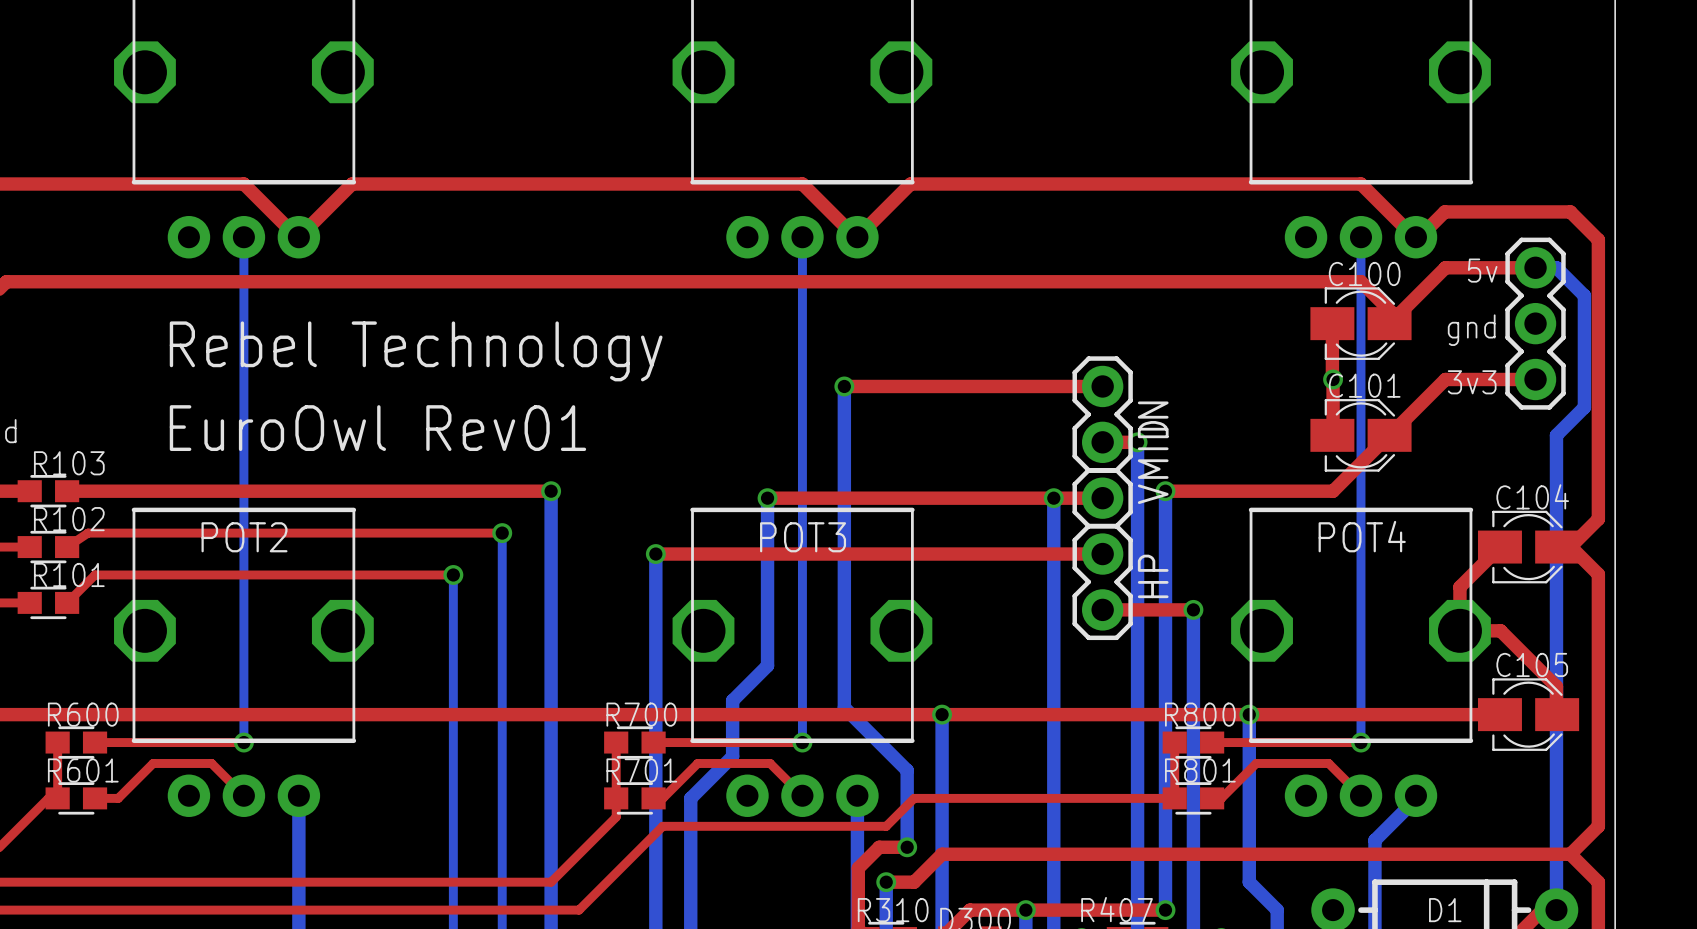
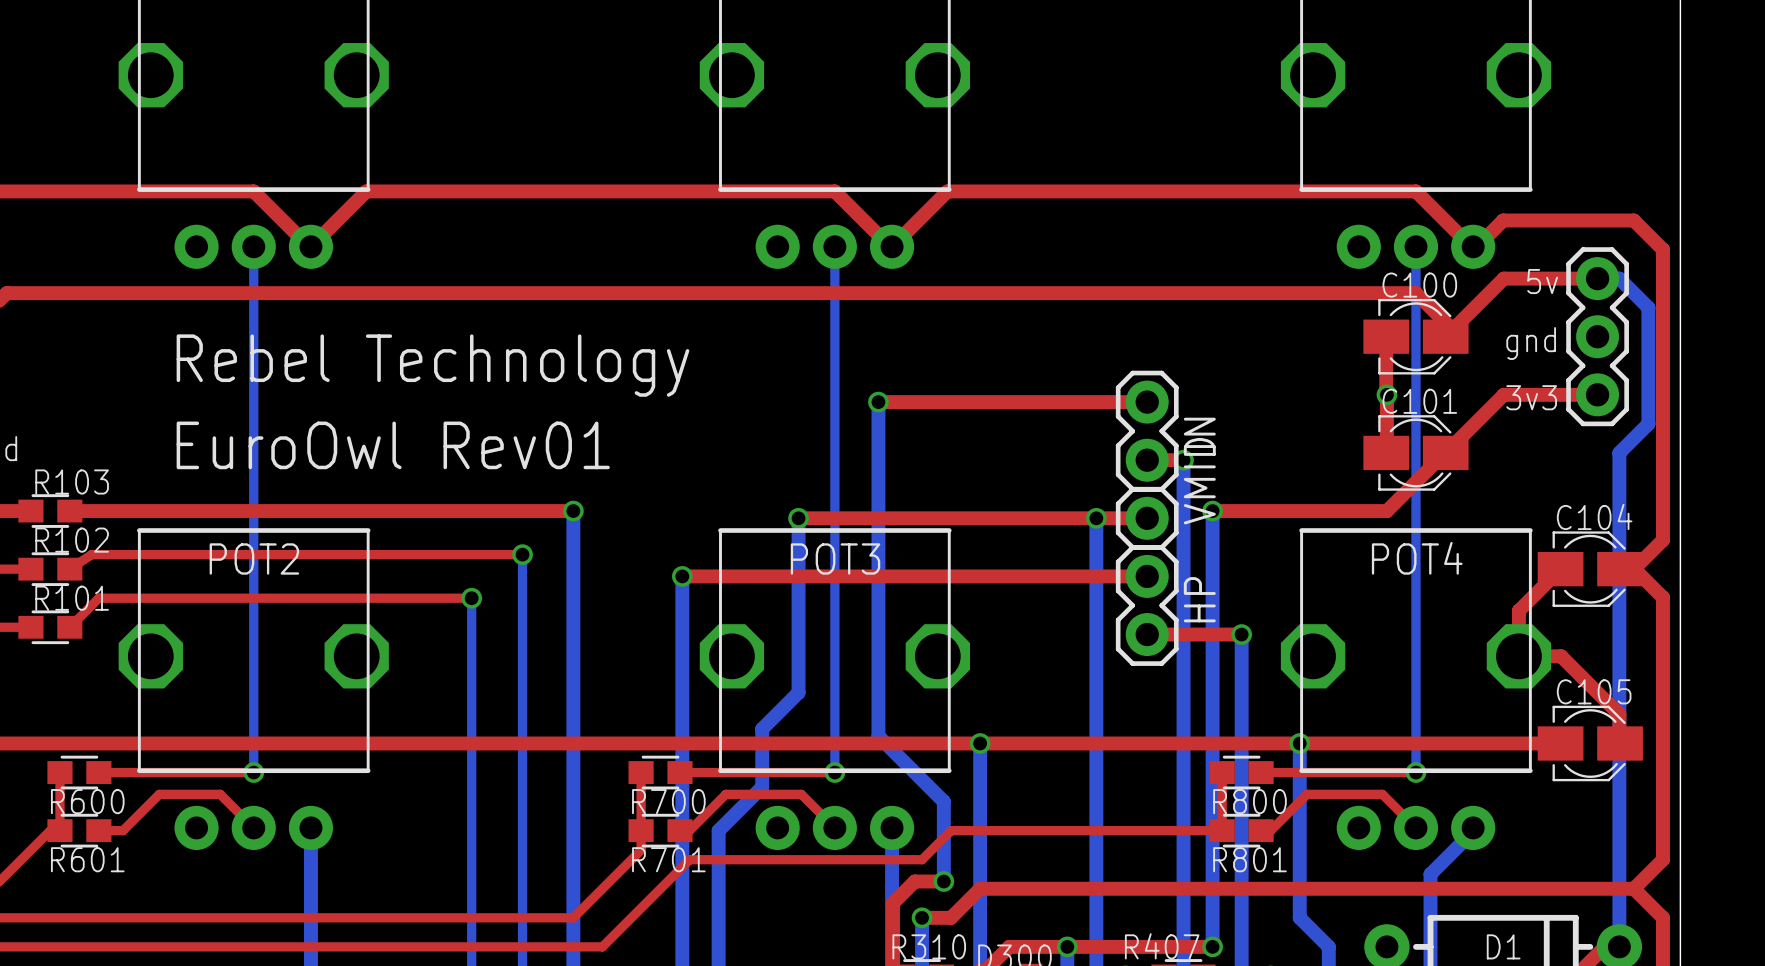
R600 name position: R600 (83, 714) -> R600 (87, 801)
R700 name position: R700 (641, 714) -> R700 (668, 801)
R800 name position: R800 (1200, 714) -> R800 (1249, 801)
R601 name position: R601 (83, 770) -> R601 (87, 859)
R701 name position: R701 (641, 770) -> R701 (668, 859)
R801 name position: R801 (1200, 770) -> R801 (1249, 859)

